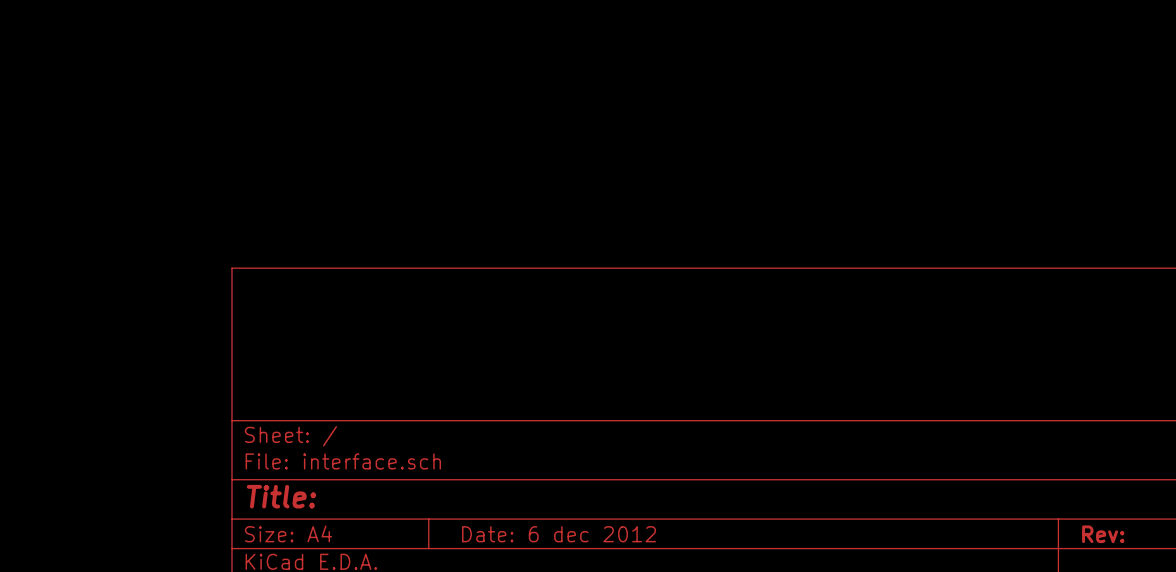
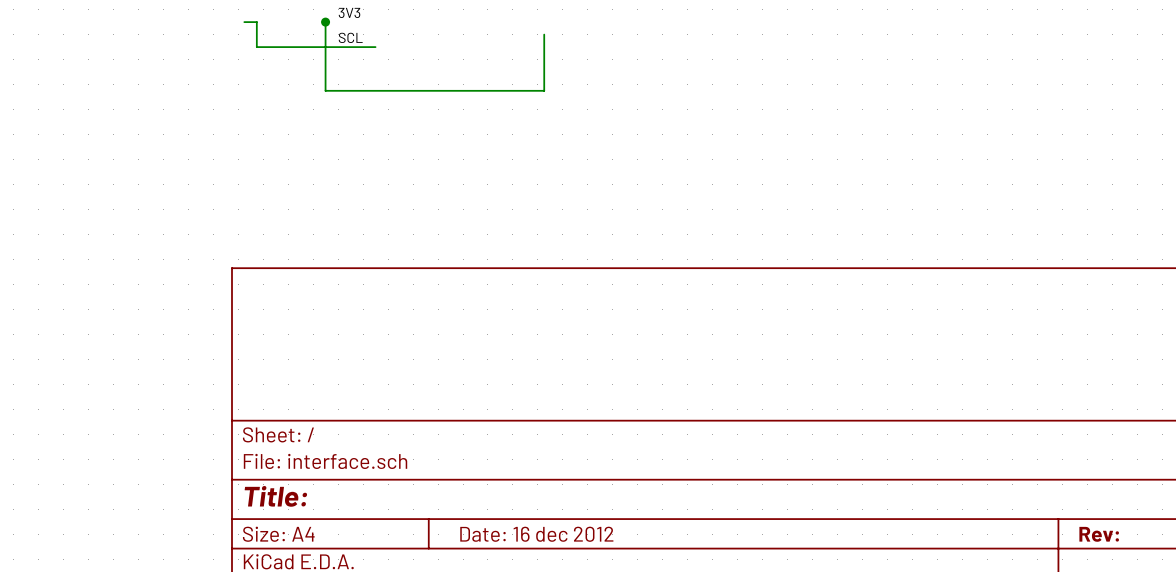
label: none -> 3V3 (349, 12)
wire: none -> (244, 22) (256, 22) (256, 47) (375, 47)
wire: none -> (325, 22) (325, 90) (544, 90) (544, 34)
junction: none -> (325, 22)
label: none -> SCL (350, 37)
title block: Date: 6 dec 2012 (559, 534) -> Date: 16 dec 2012 (536, 534)

